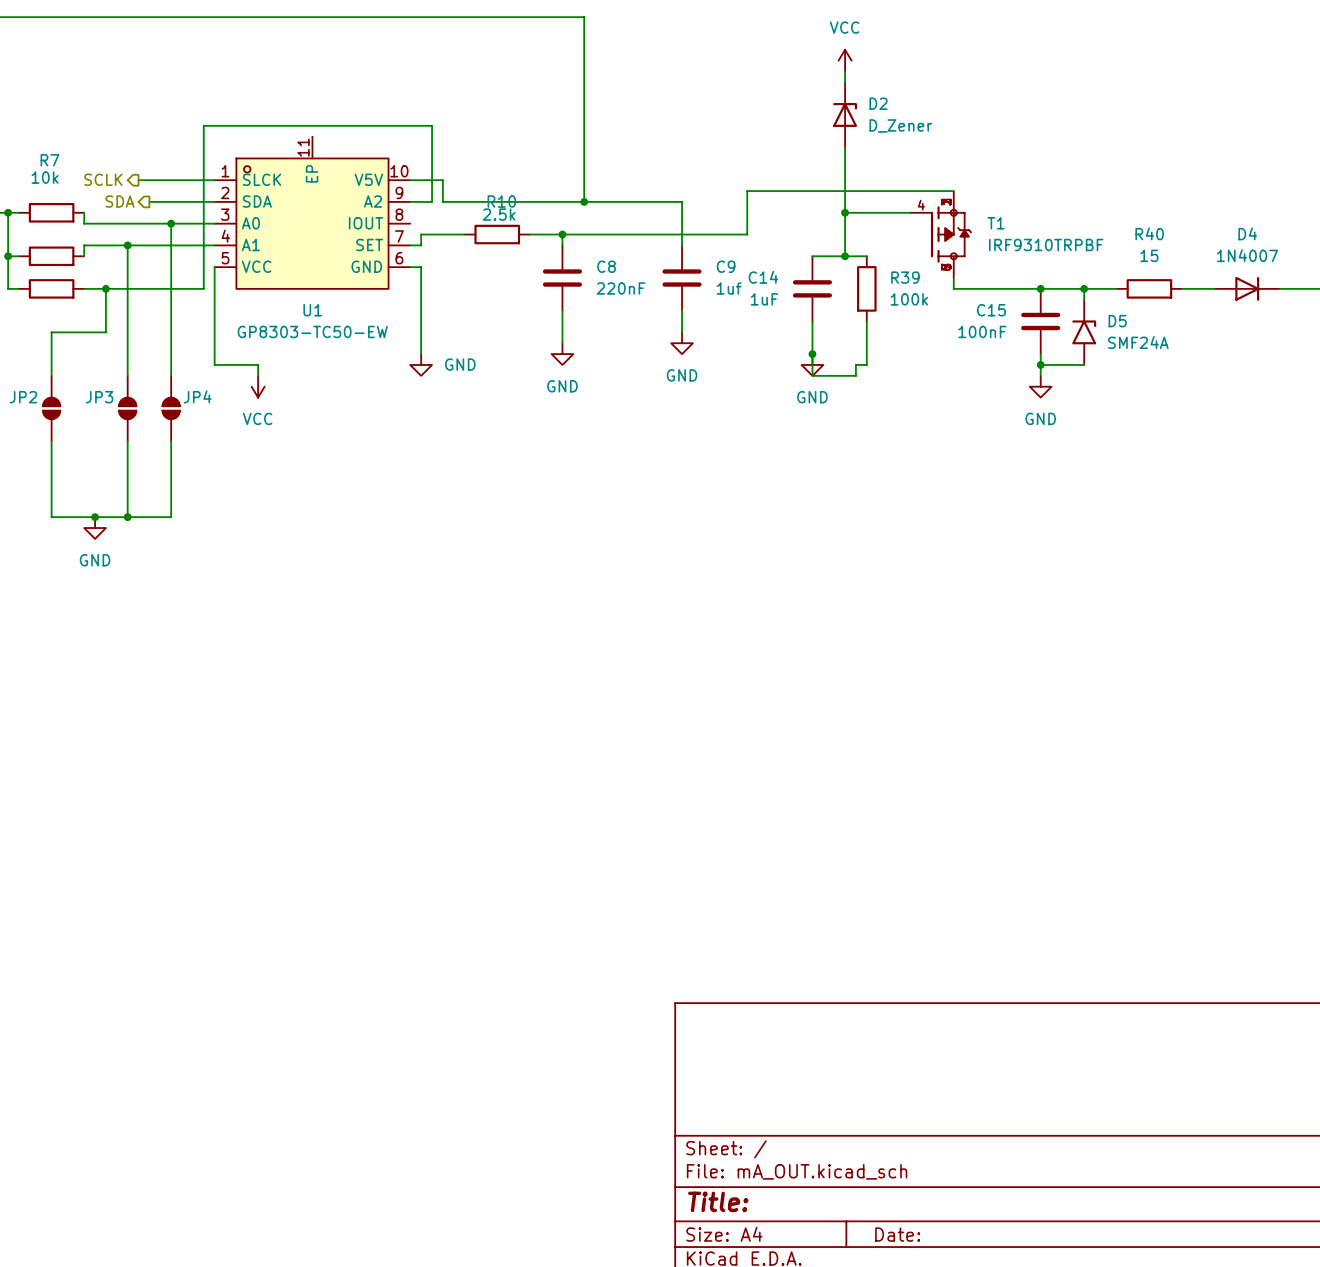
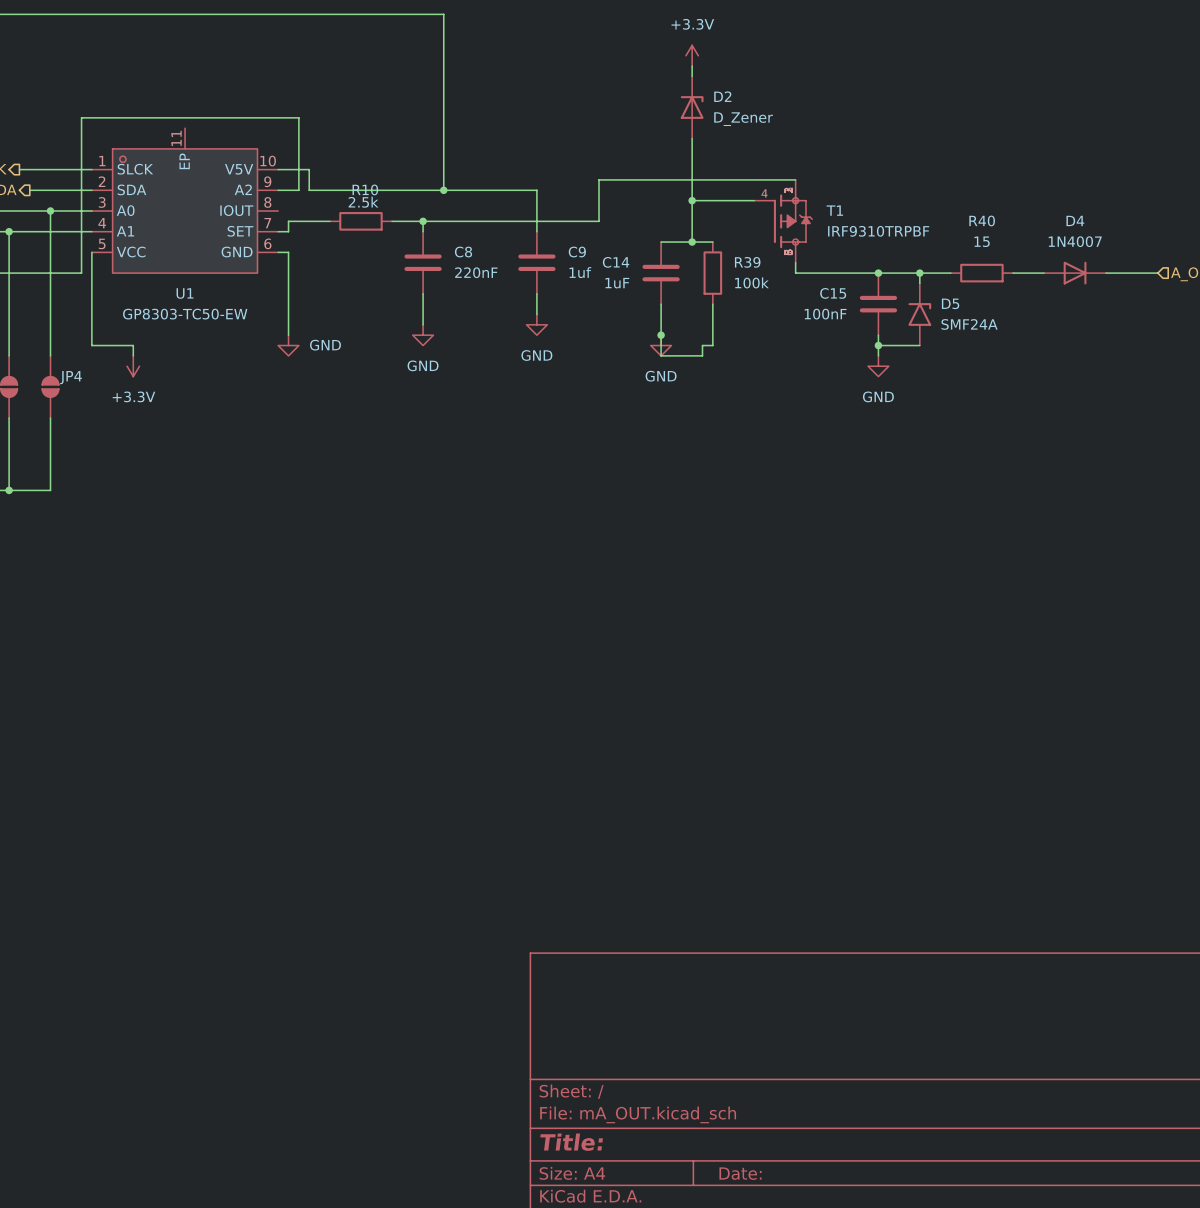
power symbol: VCC (845, 60) -> +3.3V (692, 55)
power symbol: VCC (258, 386) -> +3.3V (133, 366)

